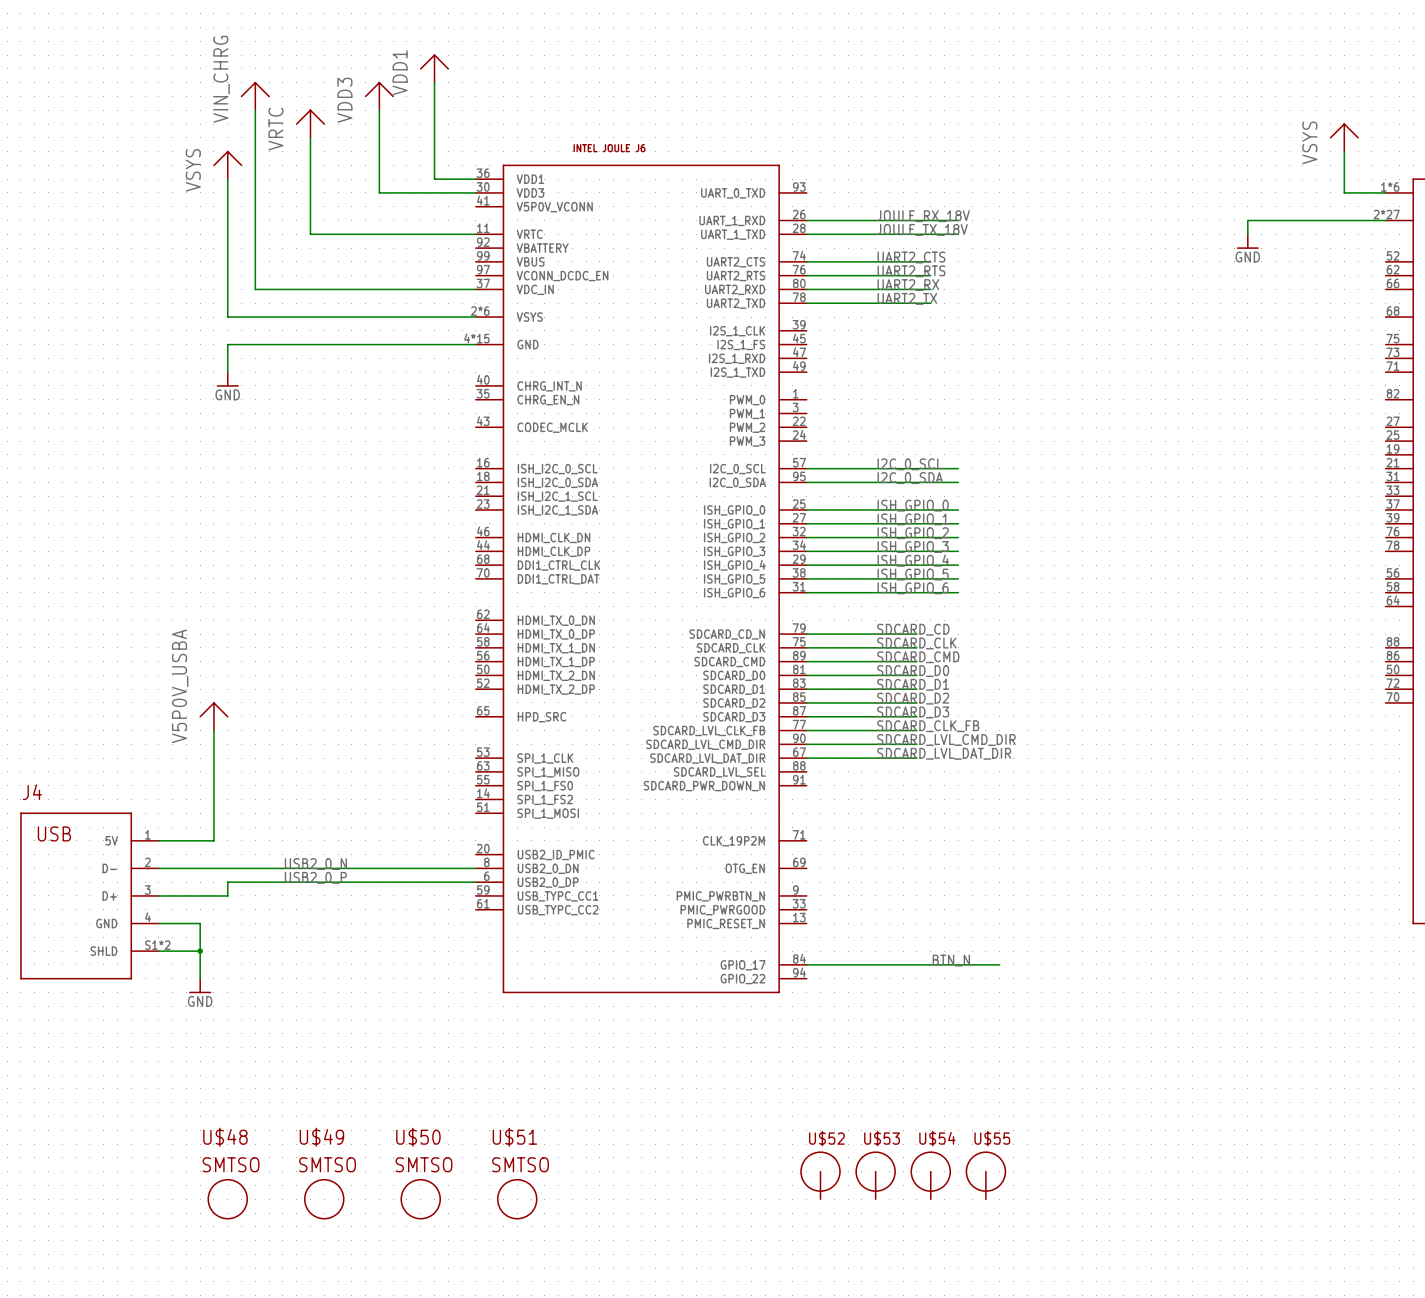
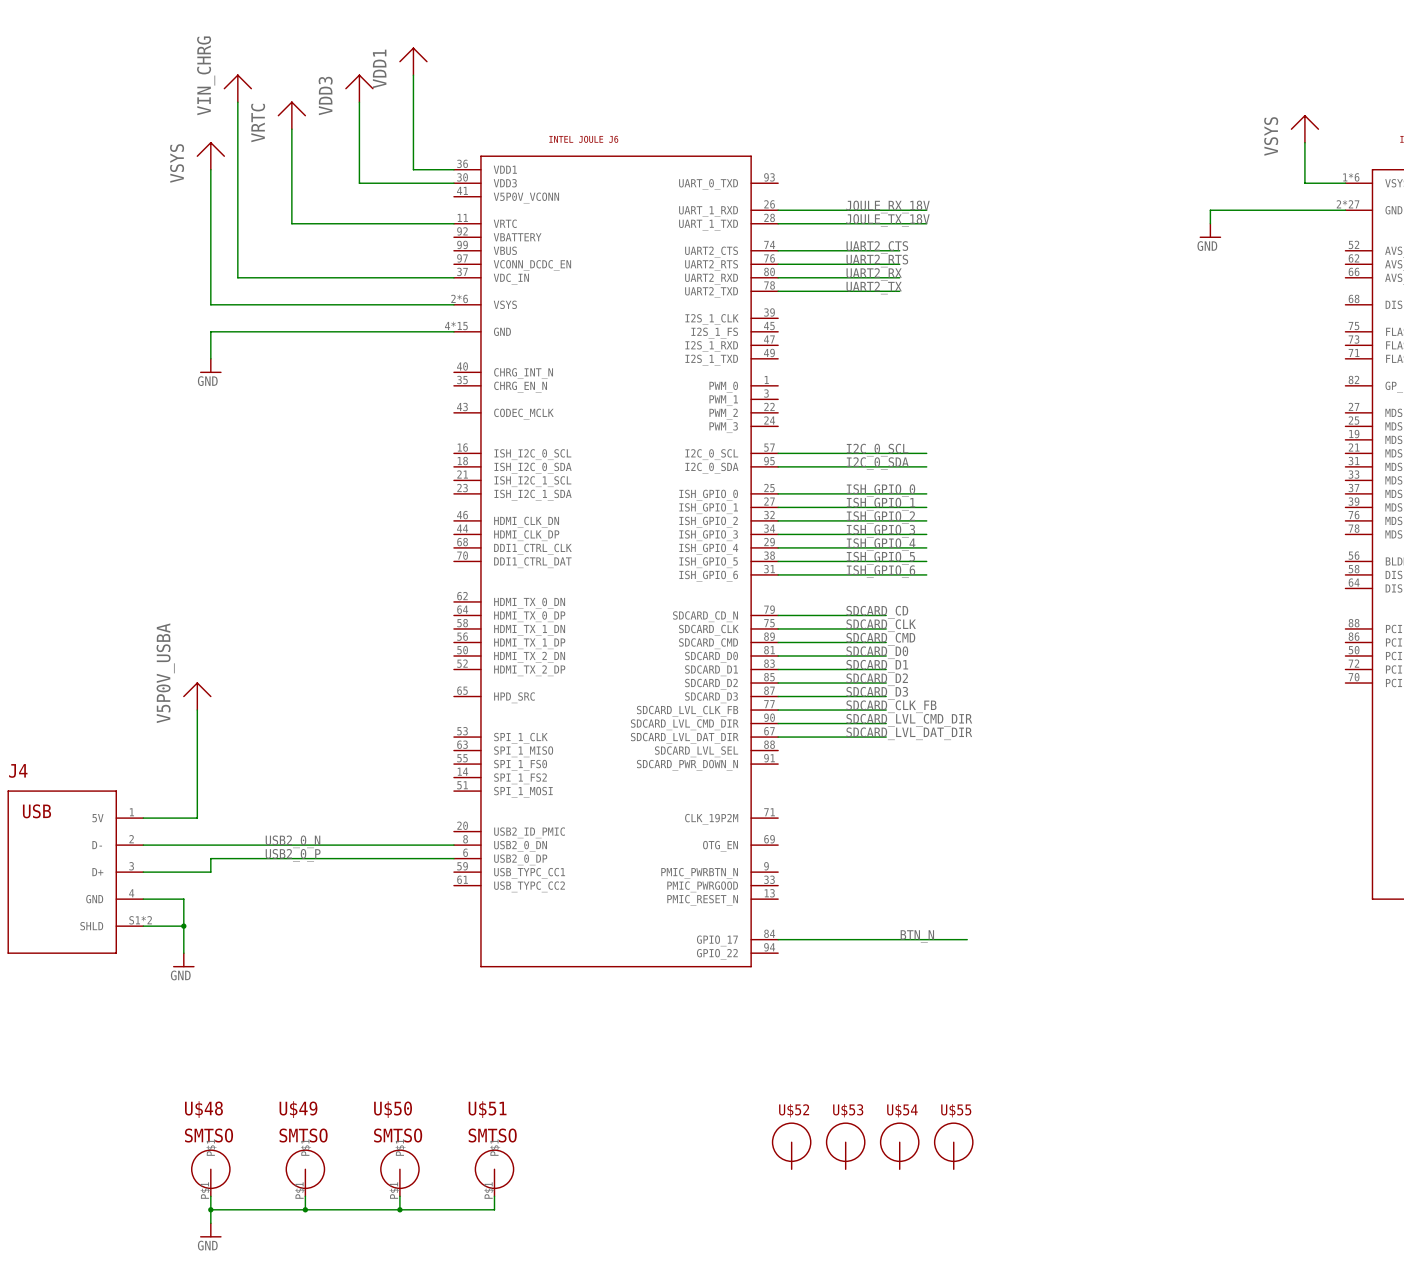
U$48 symbol: [207, 1179, 248, 1220] -> [191, 1149, 231, 1197]
U$49 symbol: [304, 1179, 345, 1220] -> [285, 1149, 326, 1197]
U$50 symbol: [400, 1179, 441, 1220] -> [380, 1149, 420, 1197]
U$51 symbol: [497, 1179, 538, 1220] -> [474, 1149, 515, 1197]
wire: none -> (210, 1196) (210, 1223)
wire: none -> (305, 1196) (305, 1209)
wire: none -> (399, 1196) (399, 1209)
wire: none -> (494, 1196) (494, 1209) (210, 1209)
junction: none -> (210, 1209)
junction: none -> (305, 1209)
junction: none -> (399, 1209)
power symbol: none -> GND (210, 1230)

